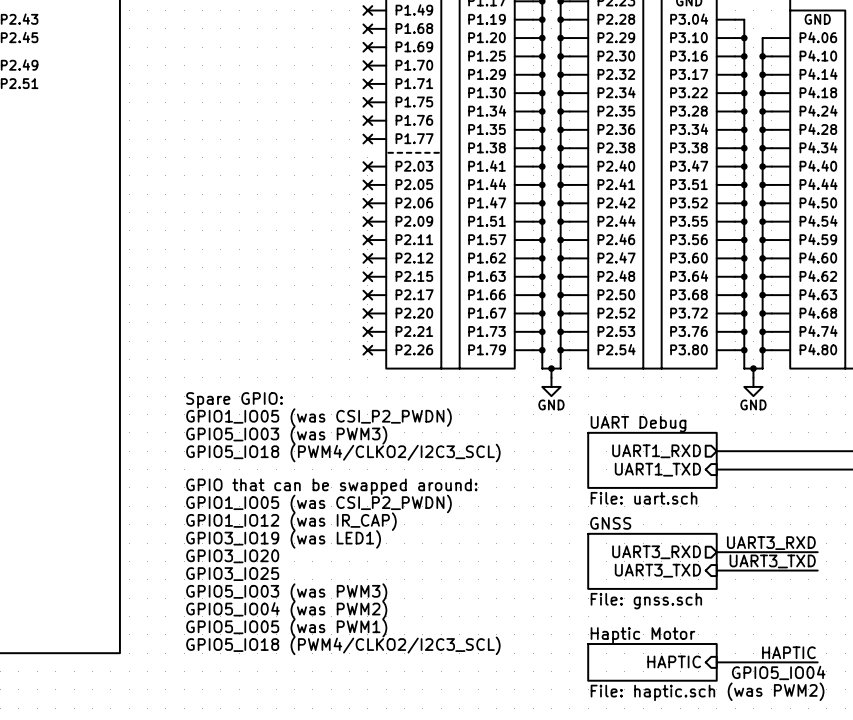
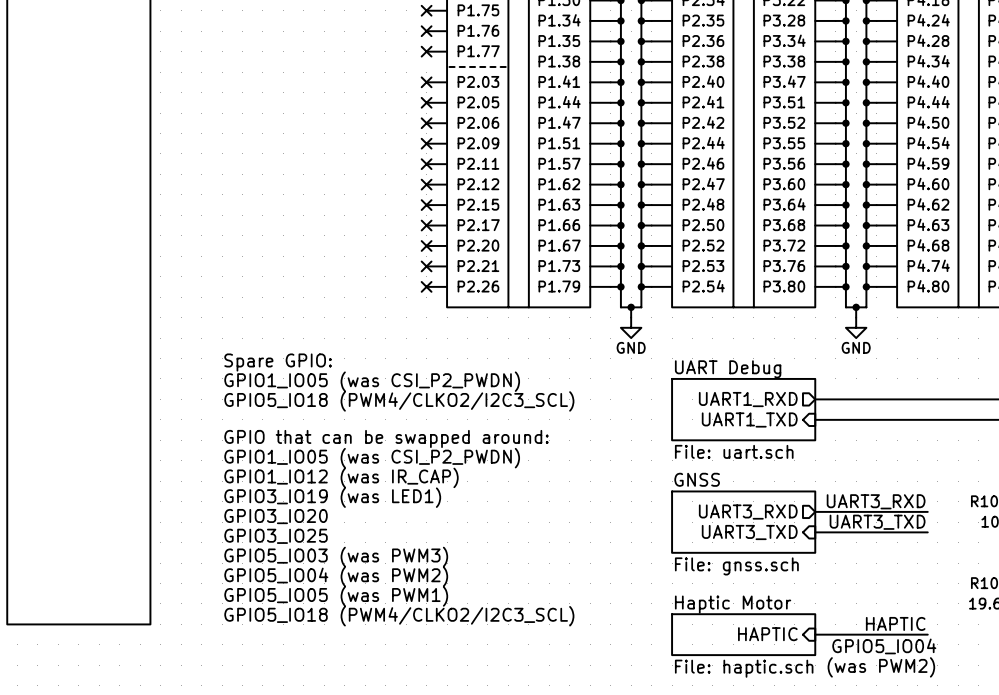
text: Spare GPIO: (234, 400) -> none
text: GPIO1_IO05 (was CSI_P2_PWDN) (318, 417) -> Spare GPIO: (278, 362)
text: GPIO5_IO03 (was PWM3) (286, 435) -> GPIO1_IO05 (was CSI_P2_PWDN) (372, 381)

